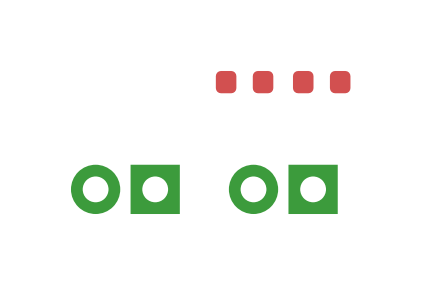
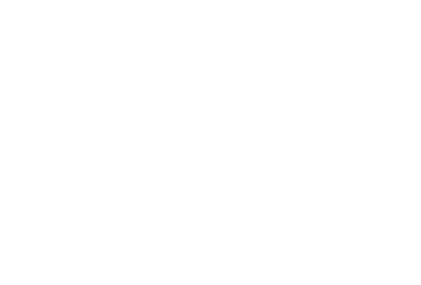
part: (244, 82) -> none
part: (321, 82) -> none
part: (125, 189) -> none
part: (283, 189) -> none

